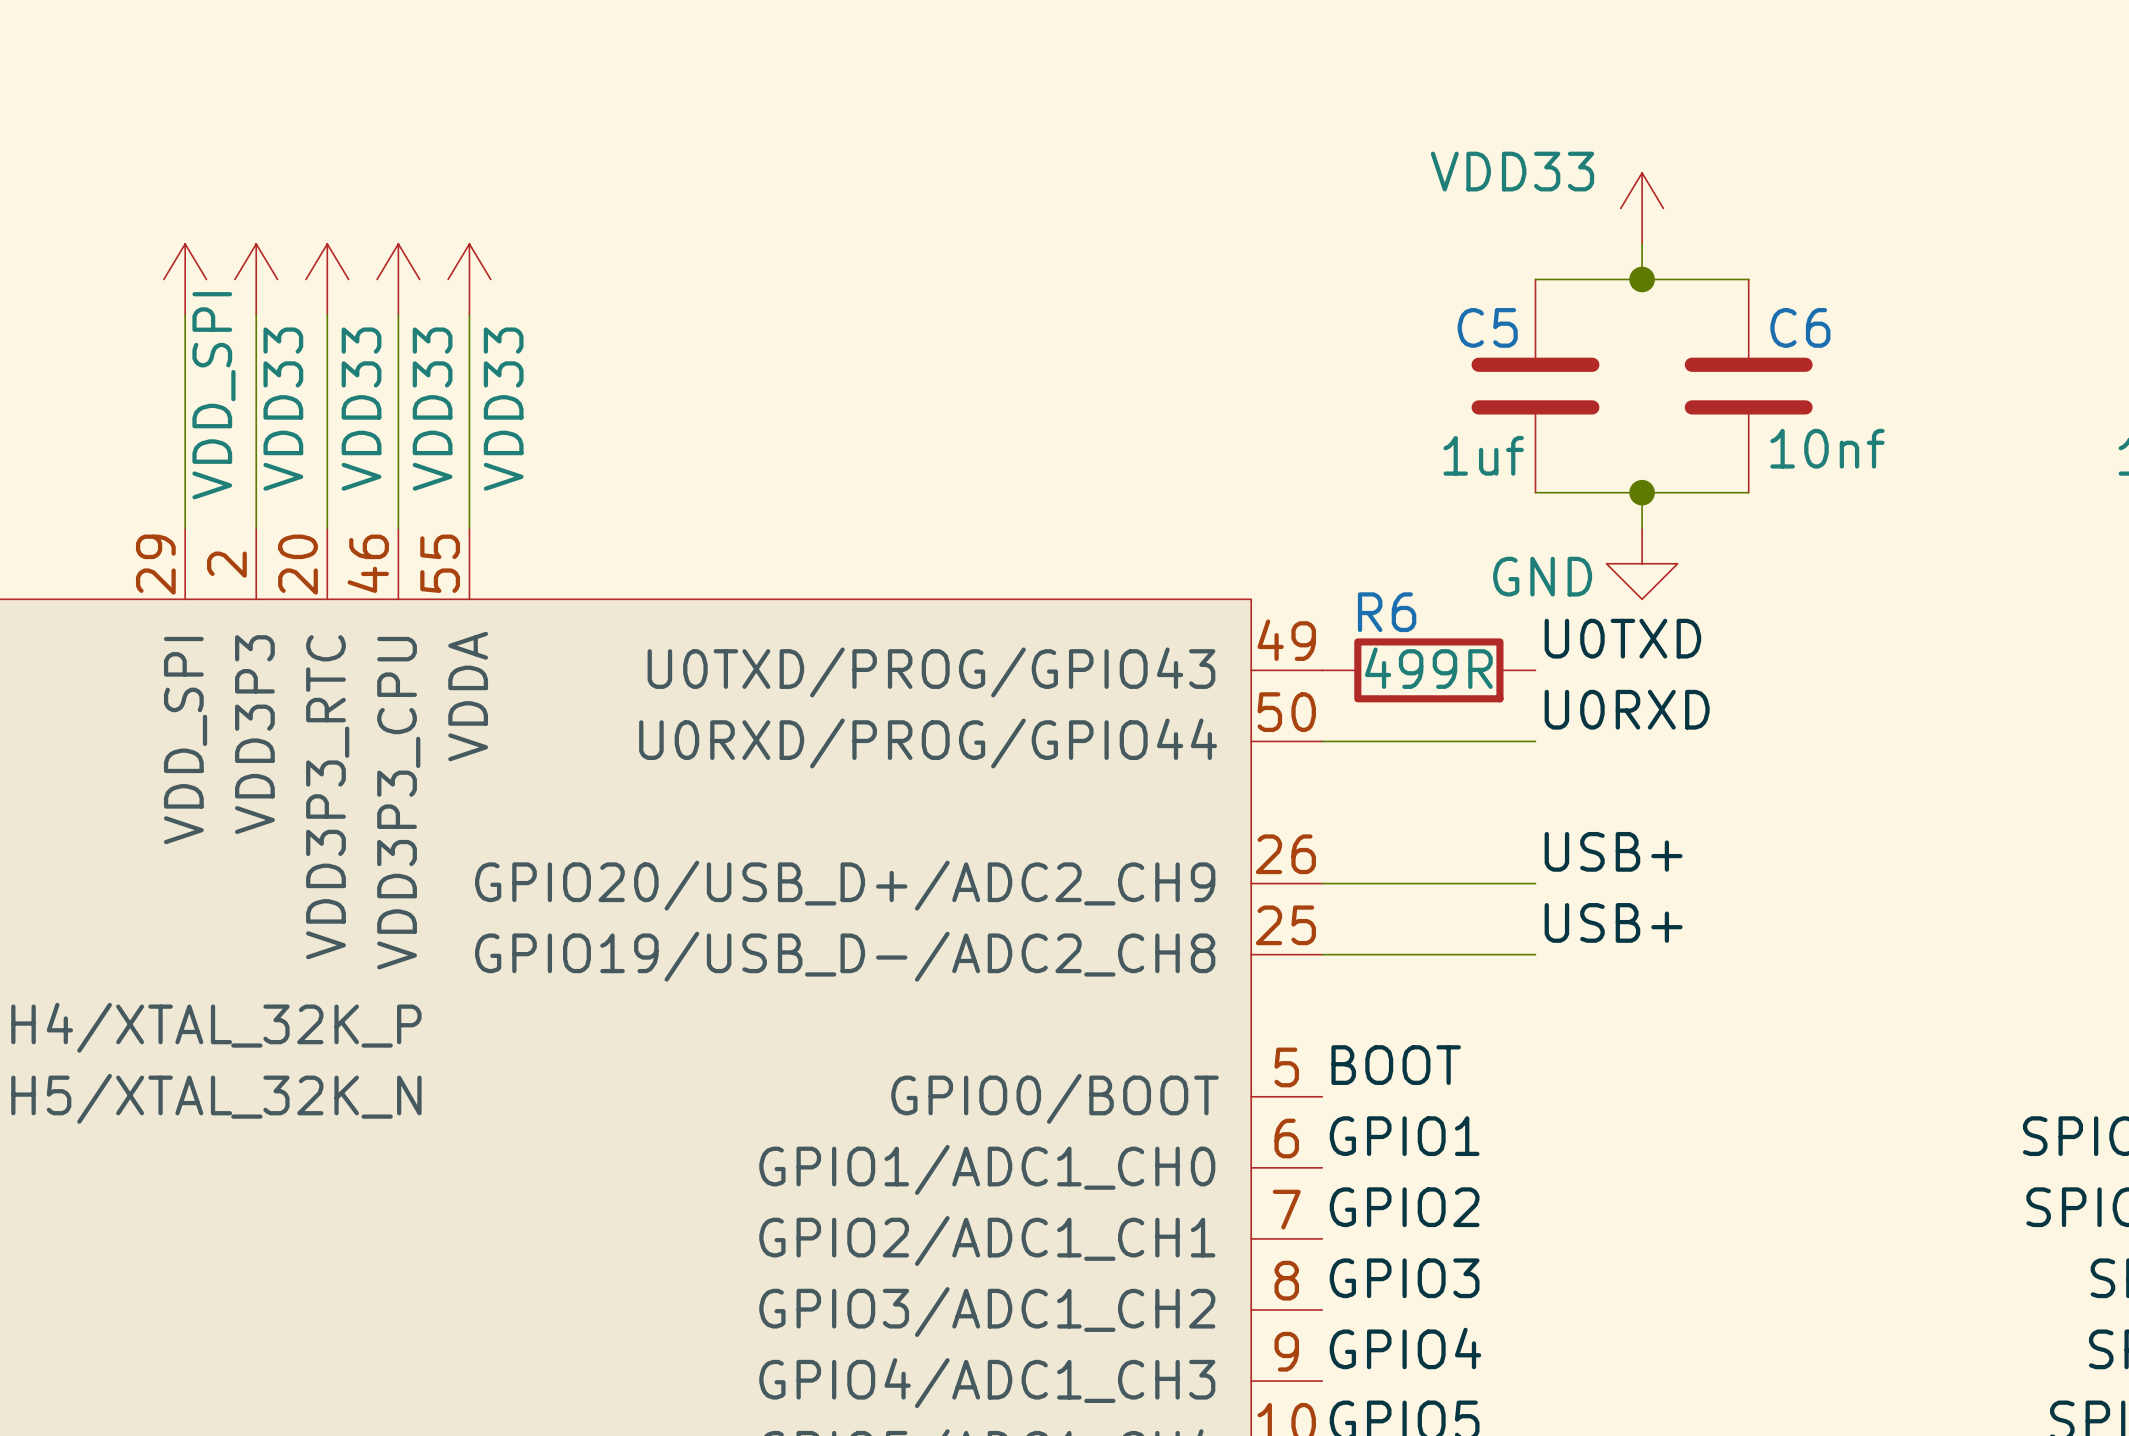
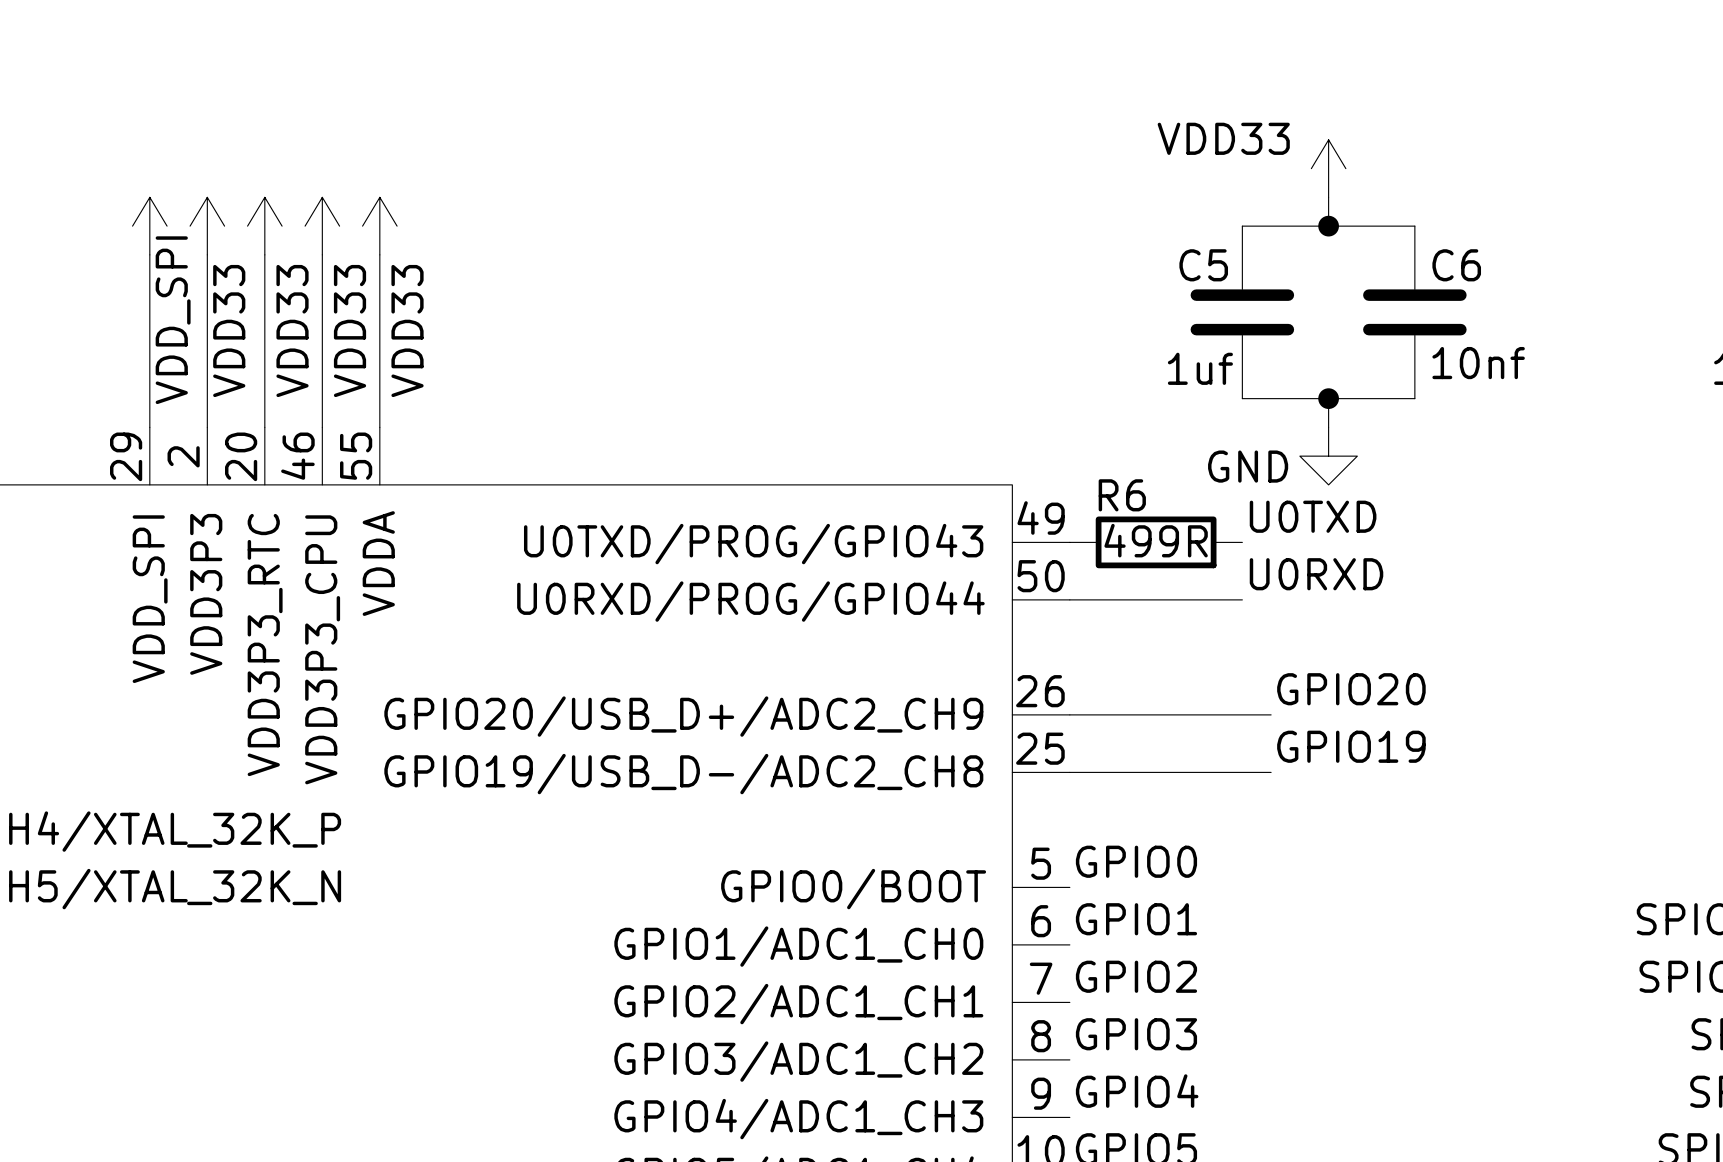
label: USB+ (1613, 851) -> none
label: none -> GPIO20 (1351, 689)
wire: none -> (1242, 714) (1271, 714)
label: USB+ (1613, 922) -> none
label: none -> GPIO19 (1351, 746)
wire: none -> (1242, 772) (1271, 772)
label: BOOT (1396, 1065) -> GPIO0 (1136, 861)

